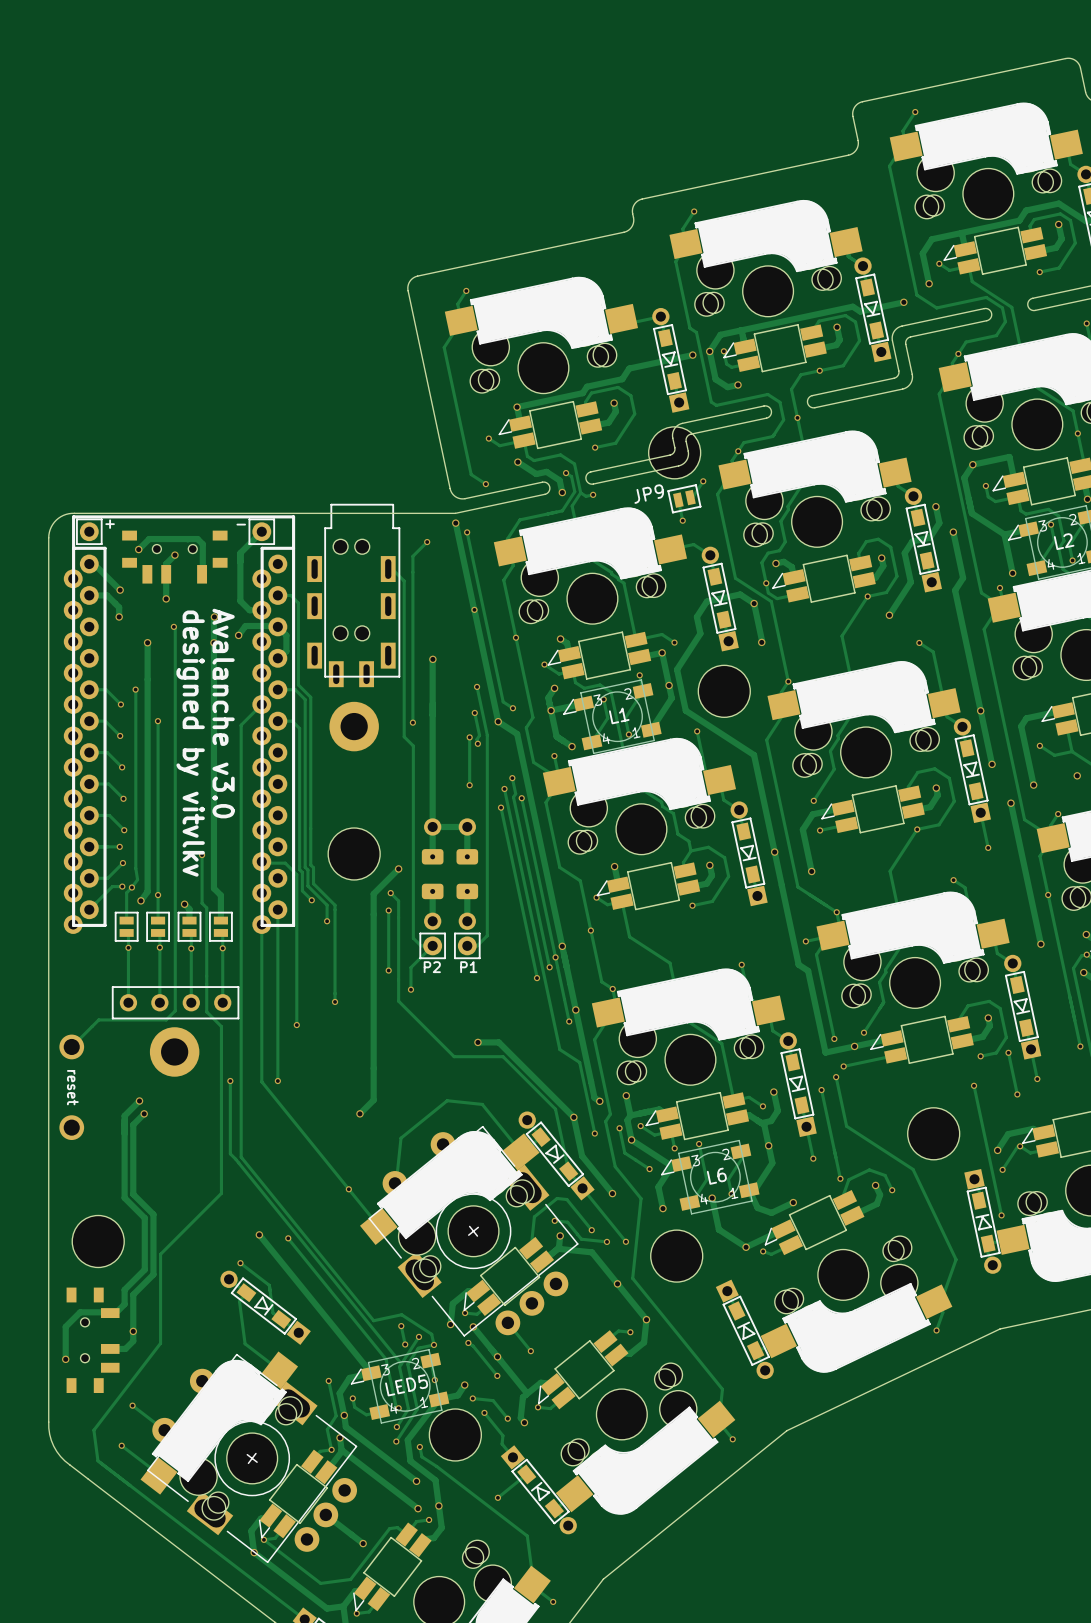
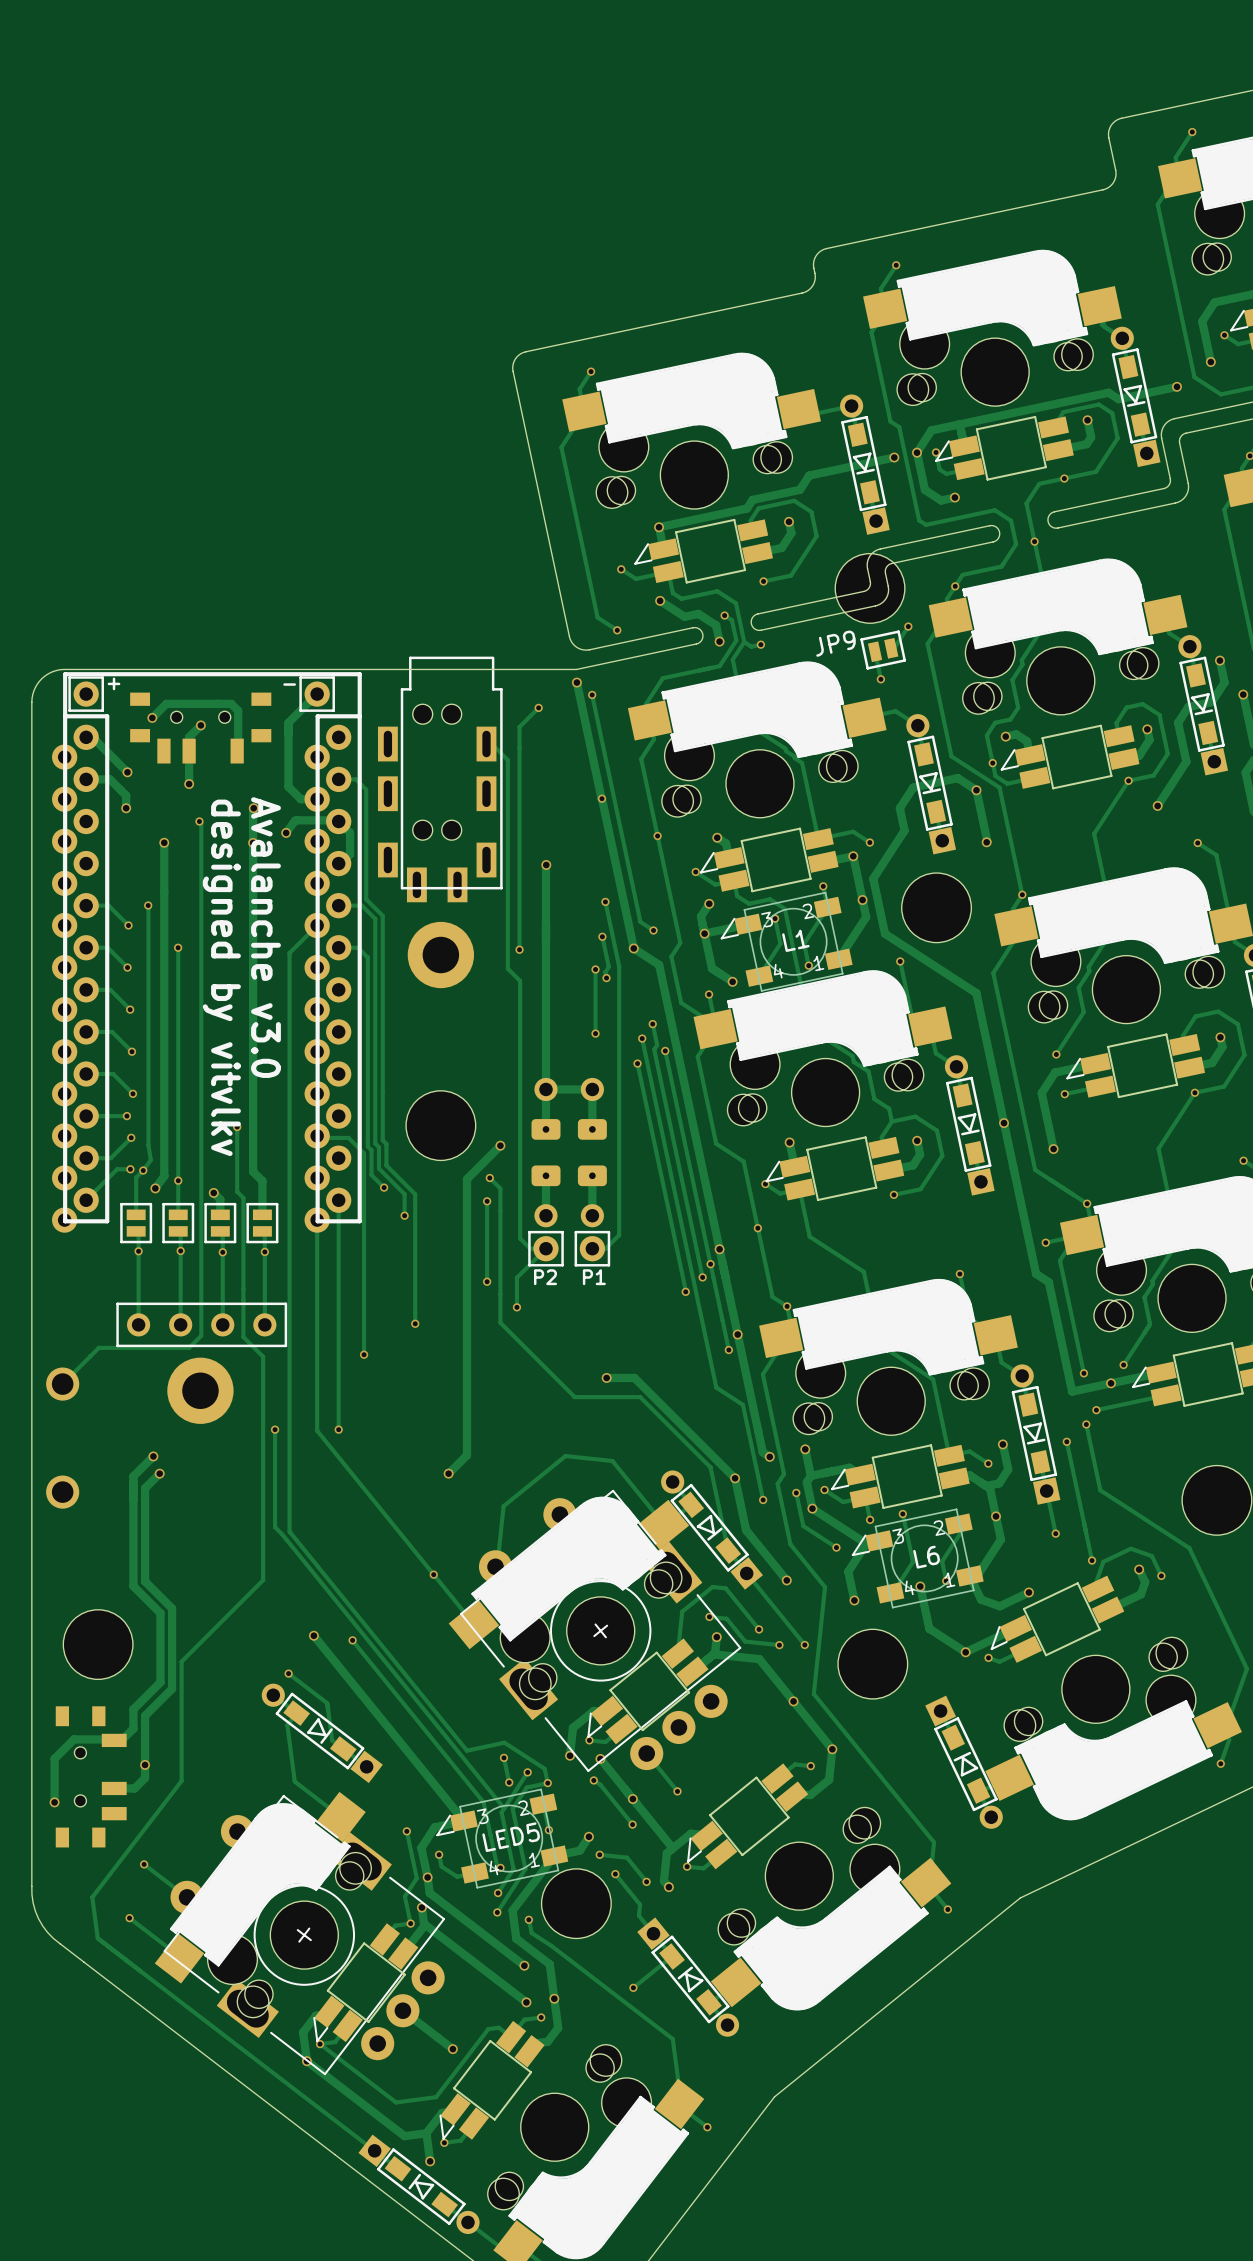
text: reset (72, 1087) -> none

